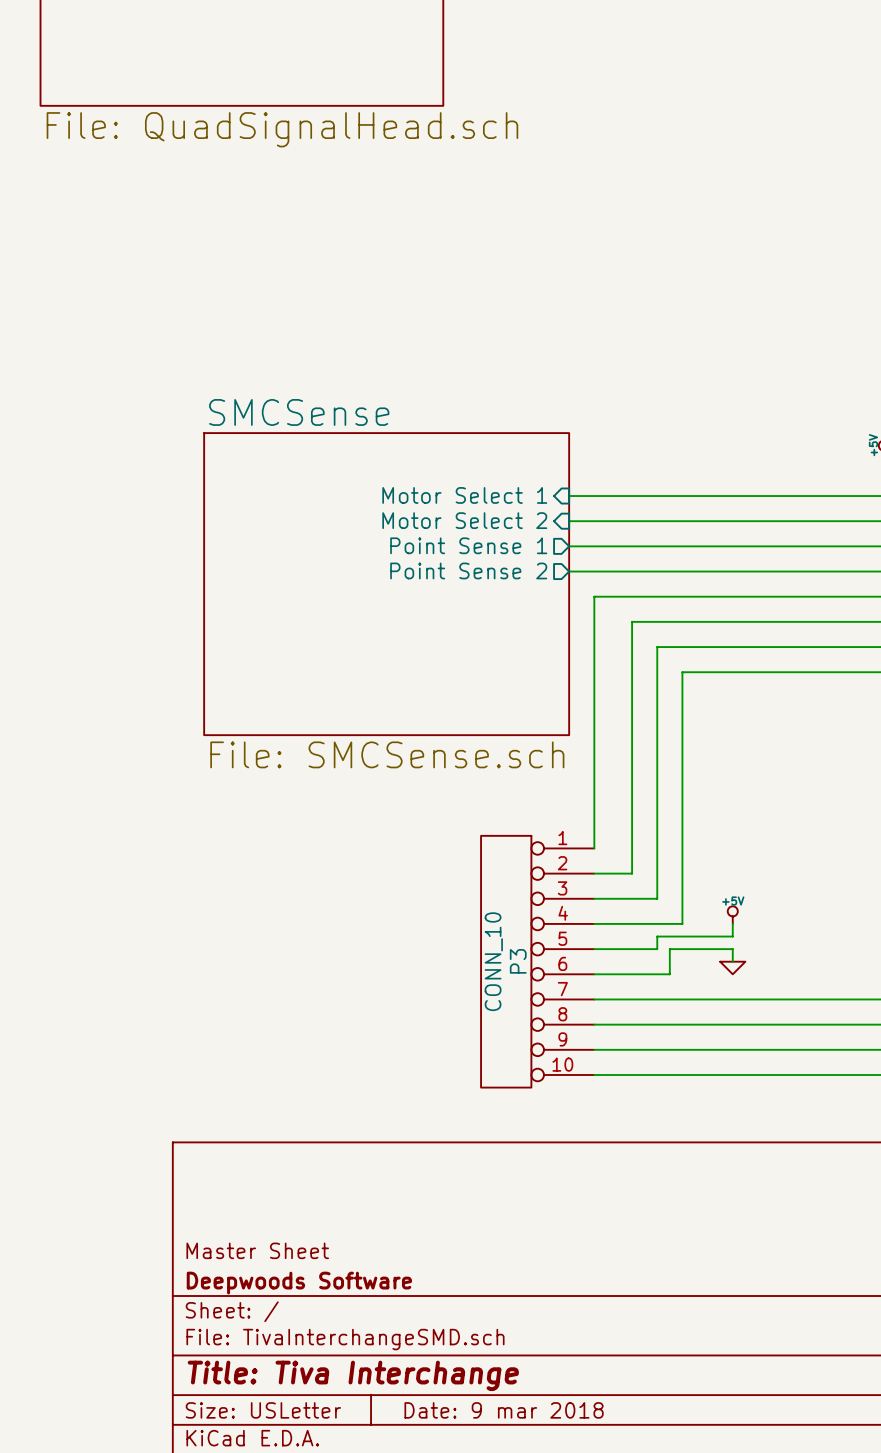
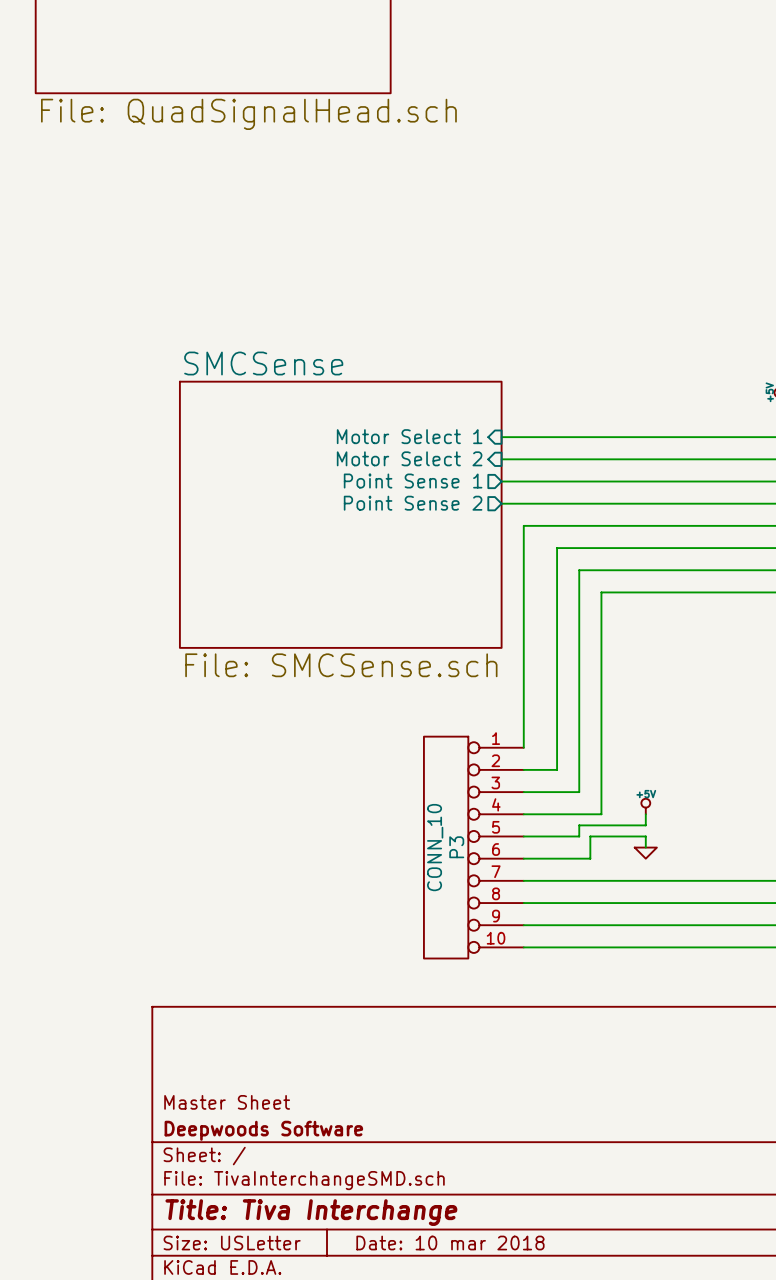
title block: Date: 9 mar 2018 (504, 1410) -> Date: 10 mar 2018 (450, 1243)

